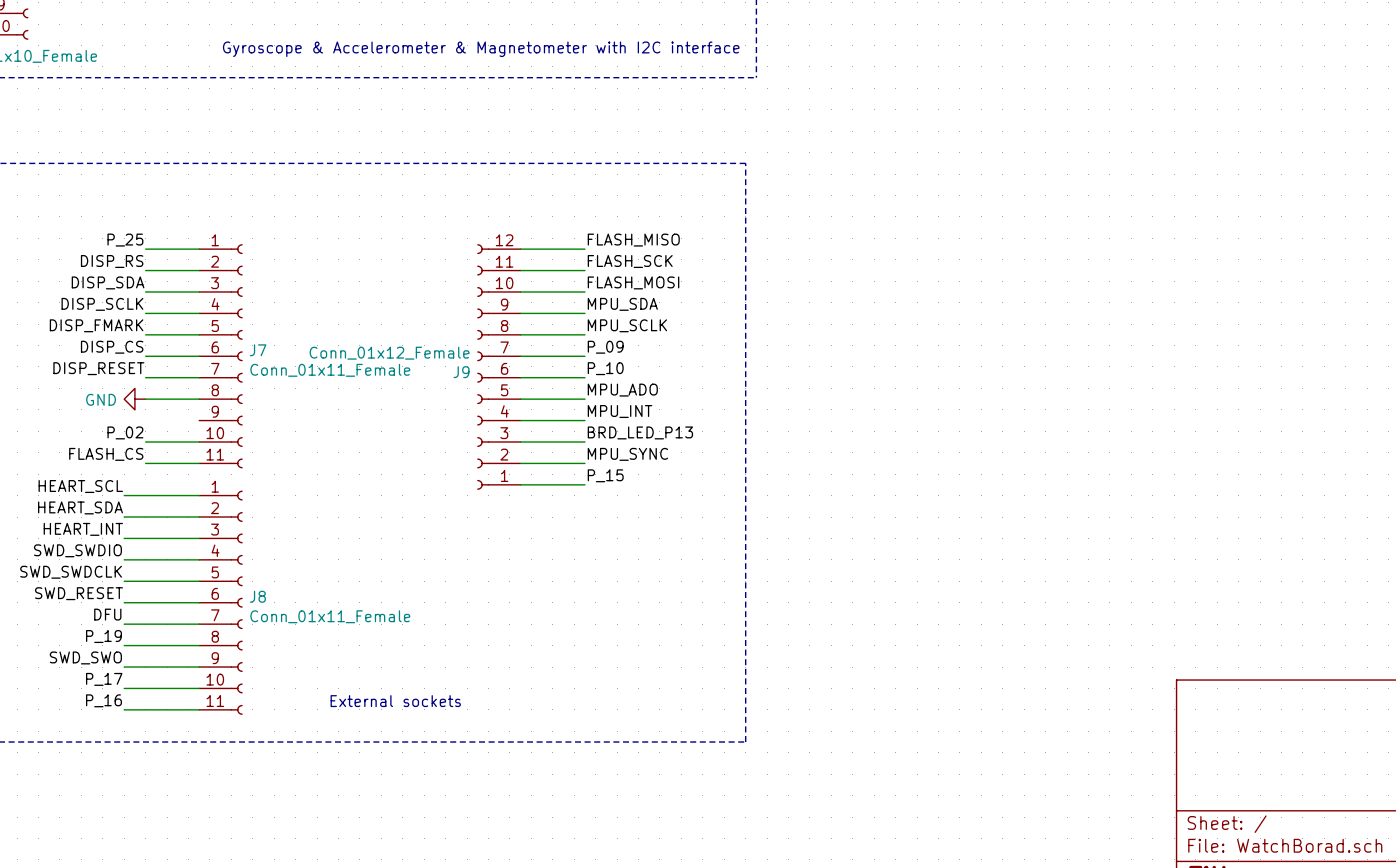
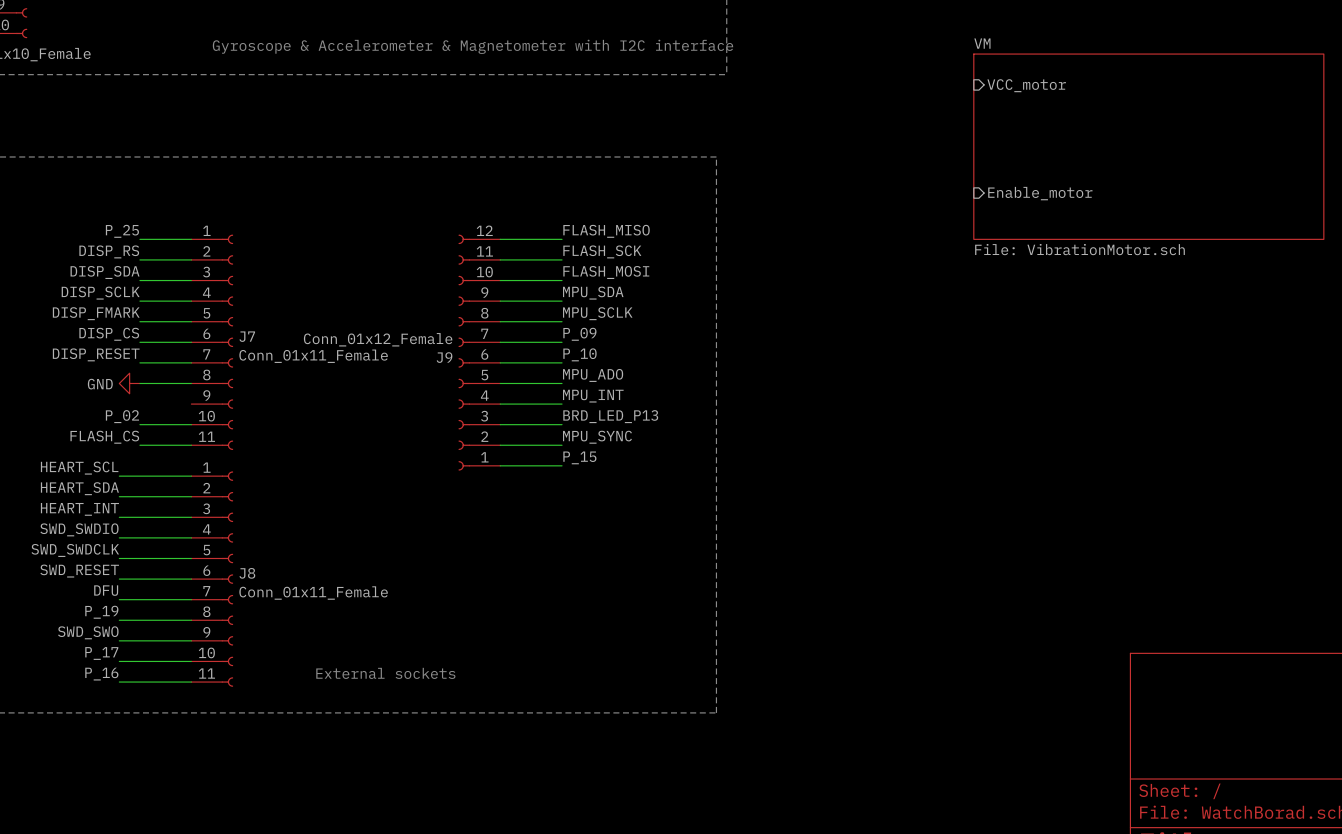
sheet pin: none -> VCC_motor (1026, 85)
sheet VM: none -> File: VibrationMotor.sch (1148, 146)
sheet pin: none -> Enable_motor (1040, 193)

